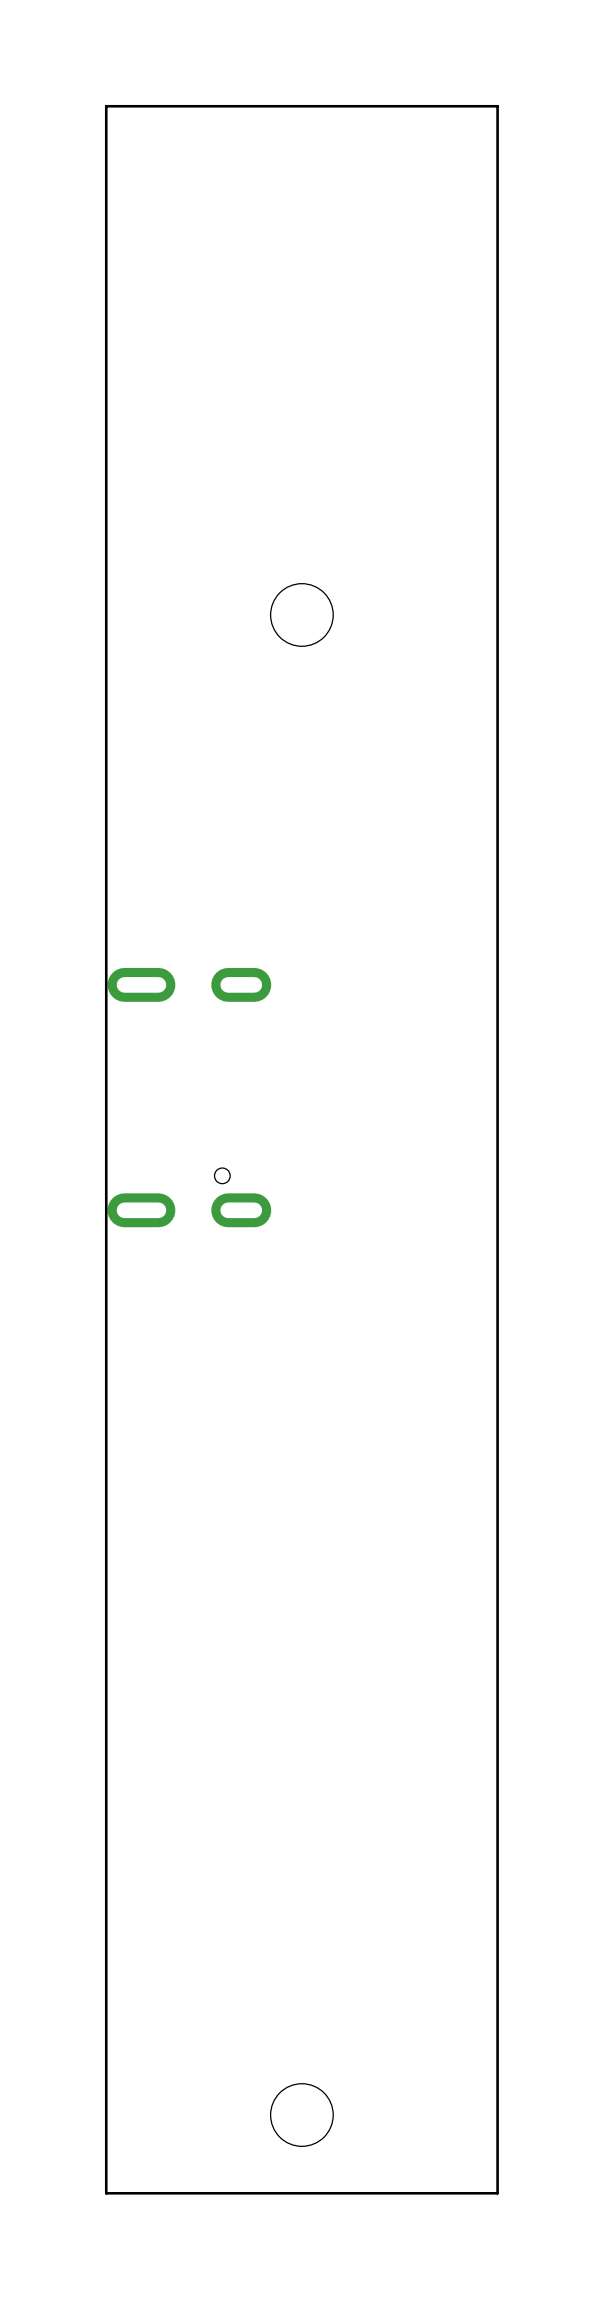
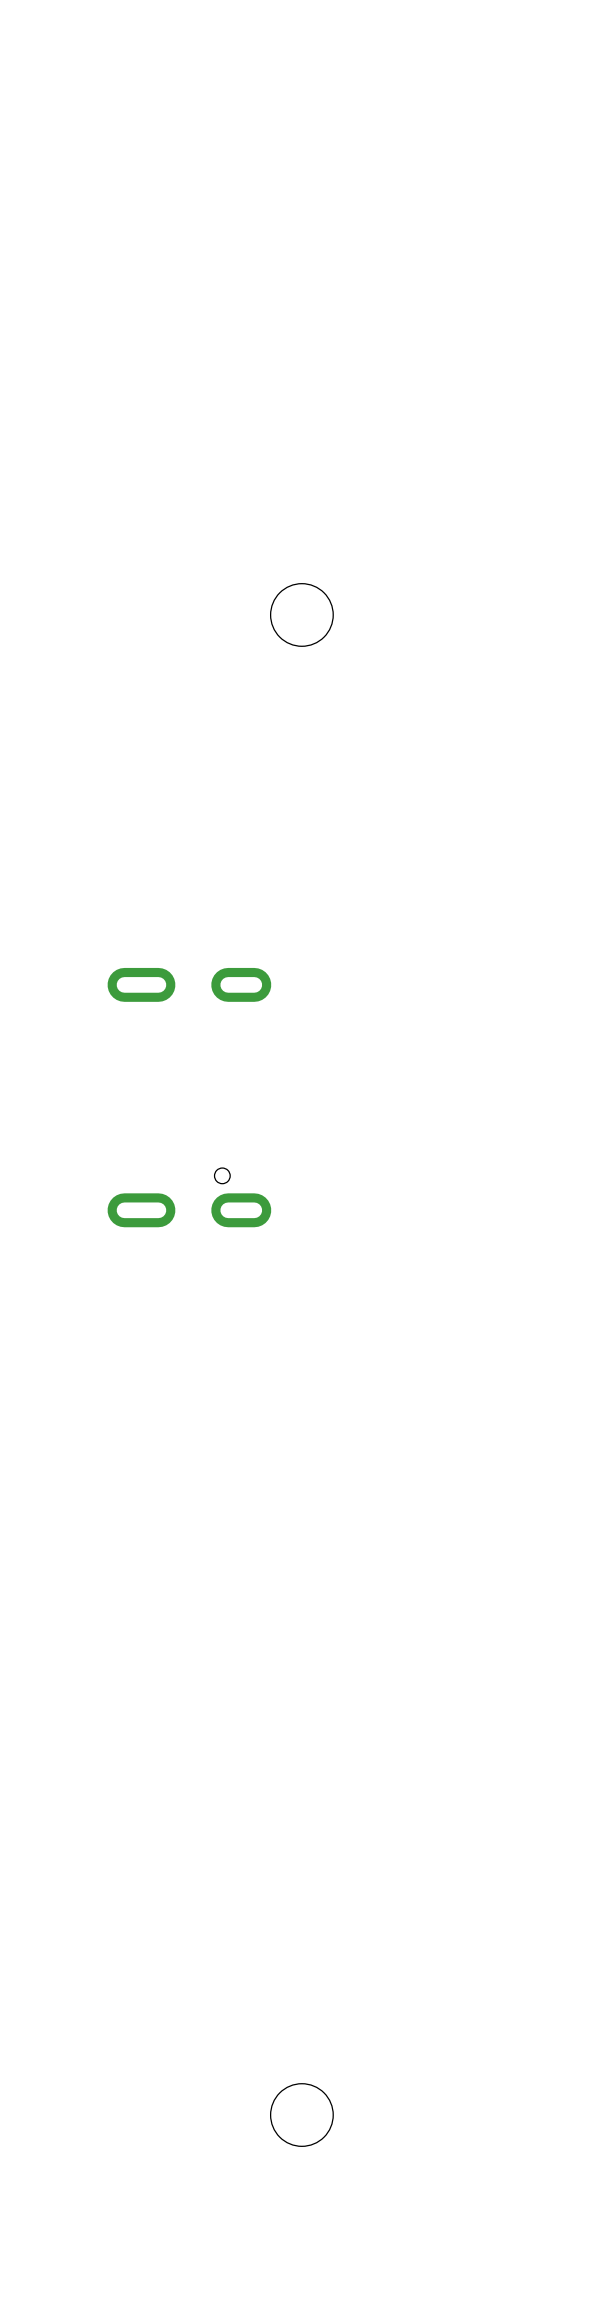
board edge: (497, 106) (106, 106) (106, 2193) (497, 2193) (497, 106) -> none

